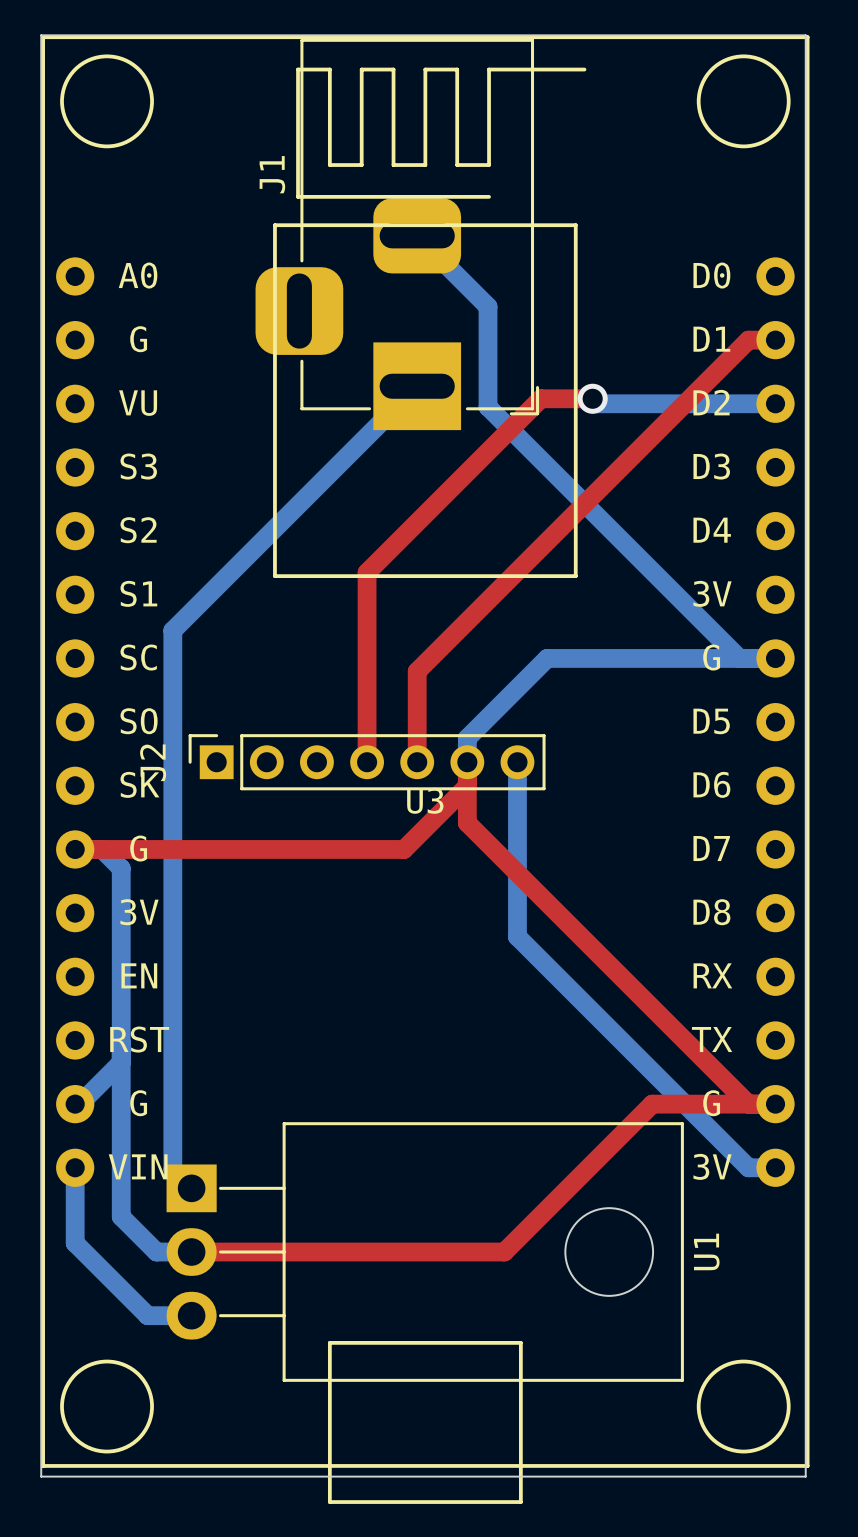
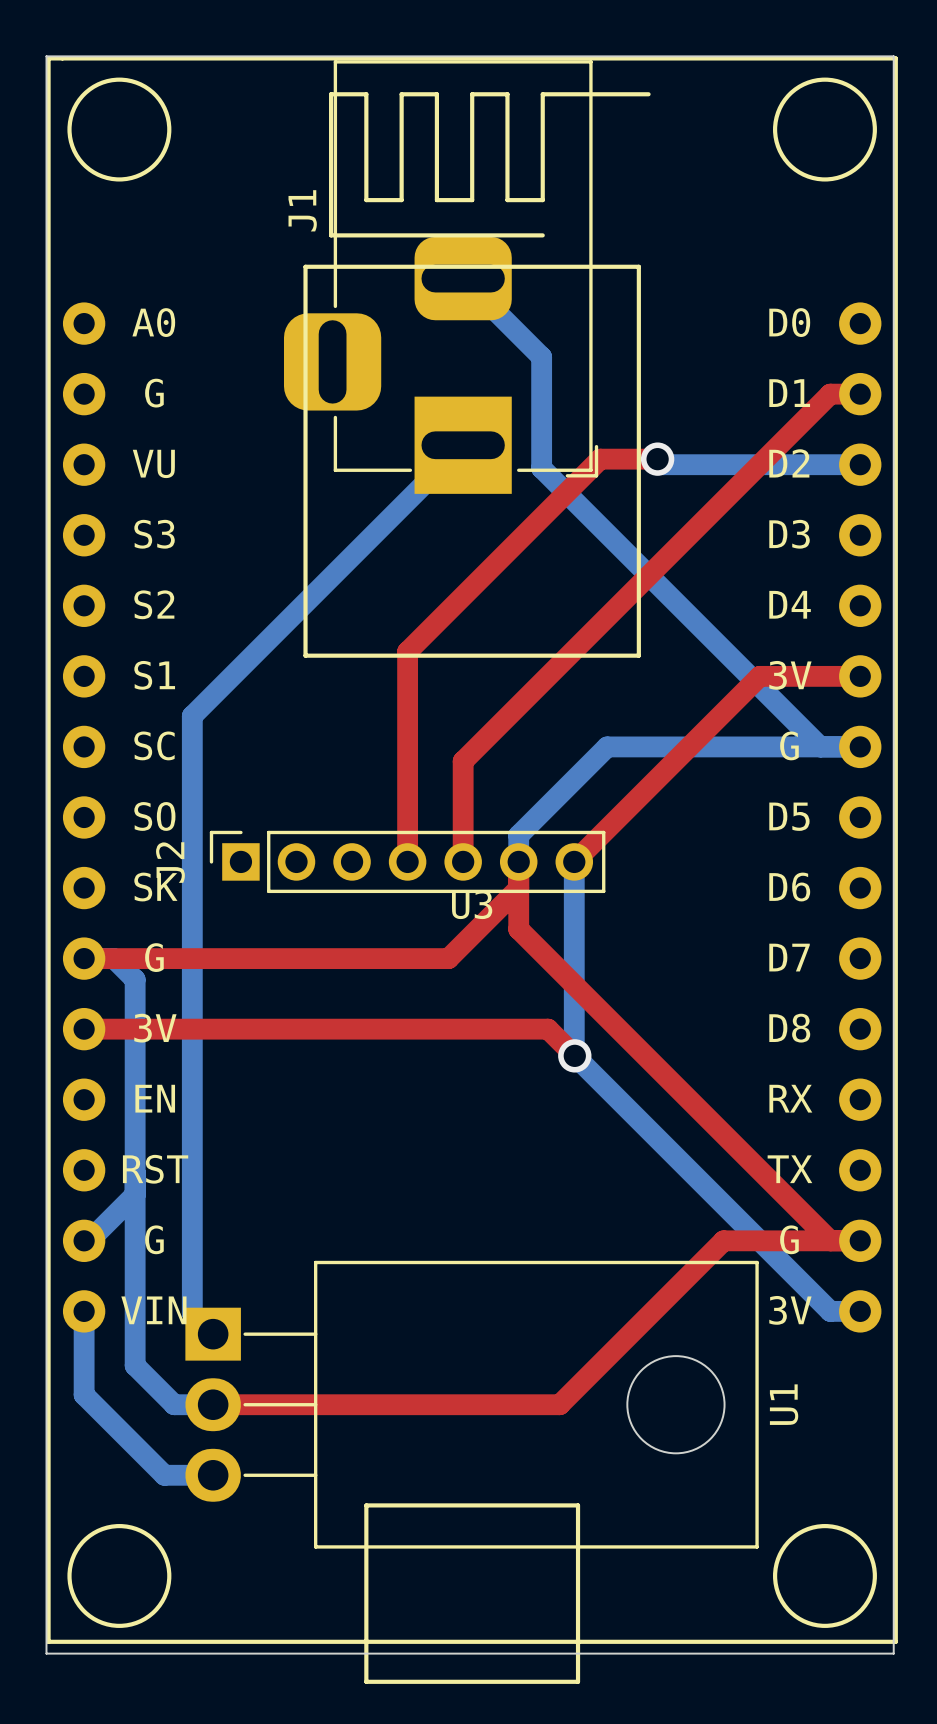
top track: none -> (860, 676) (759, 676) (574, 861)
top track: none -> (84, 1029) (548, 1029) (574, 1055)
via: none -> (574, 1055)

